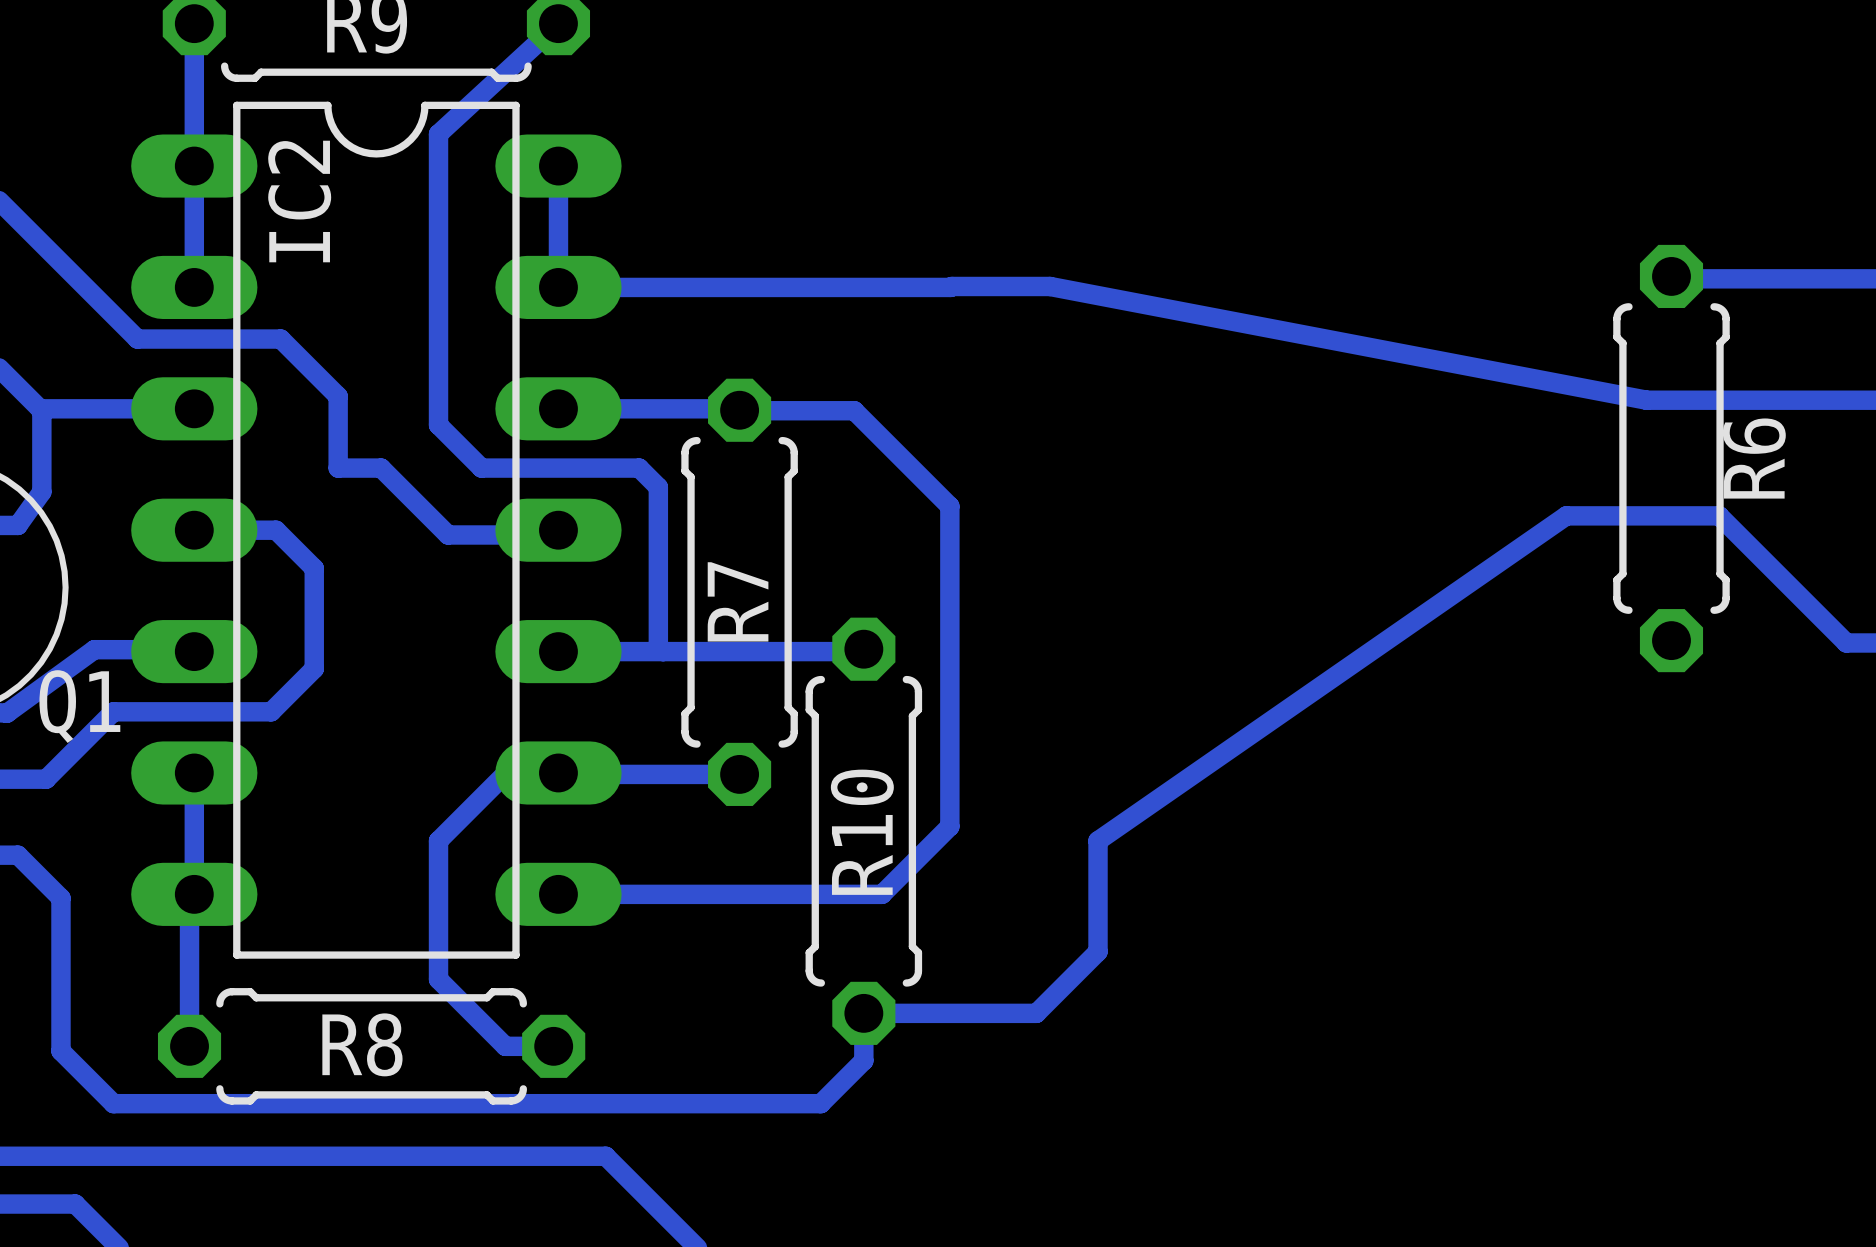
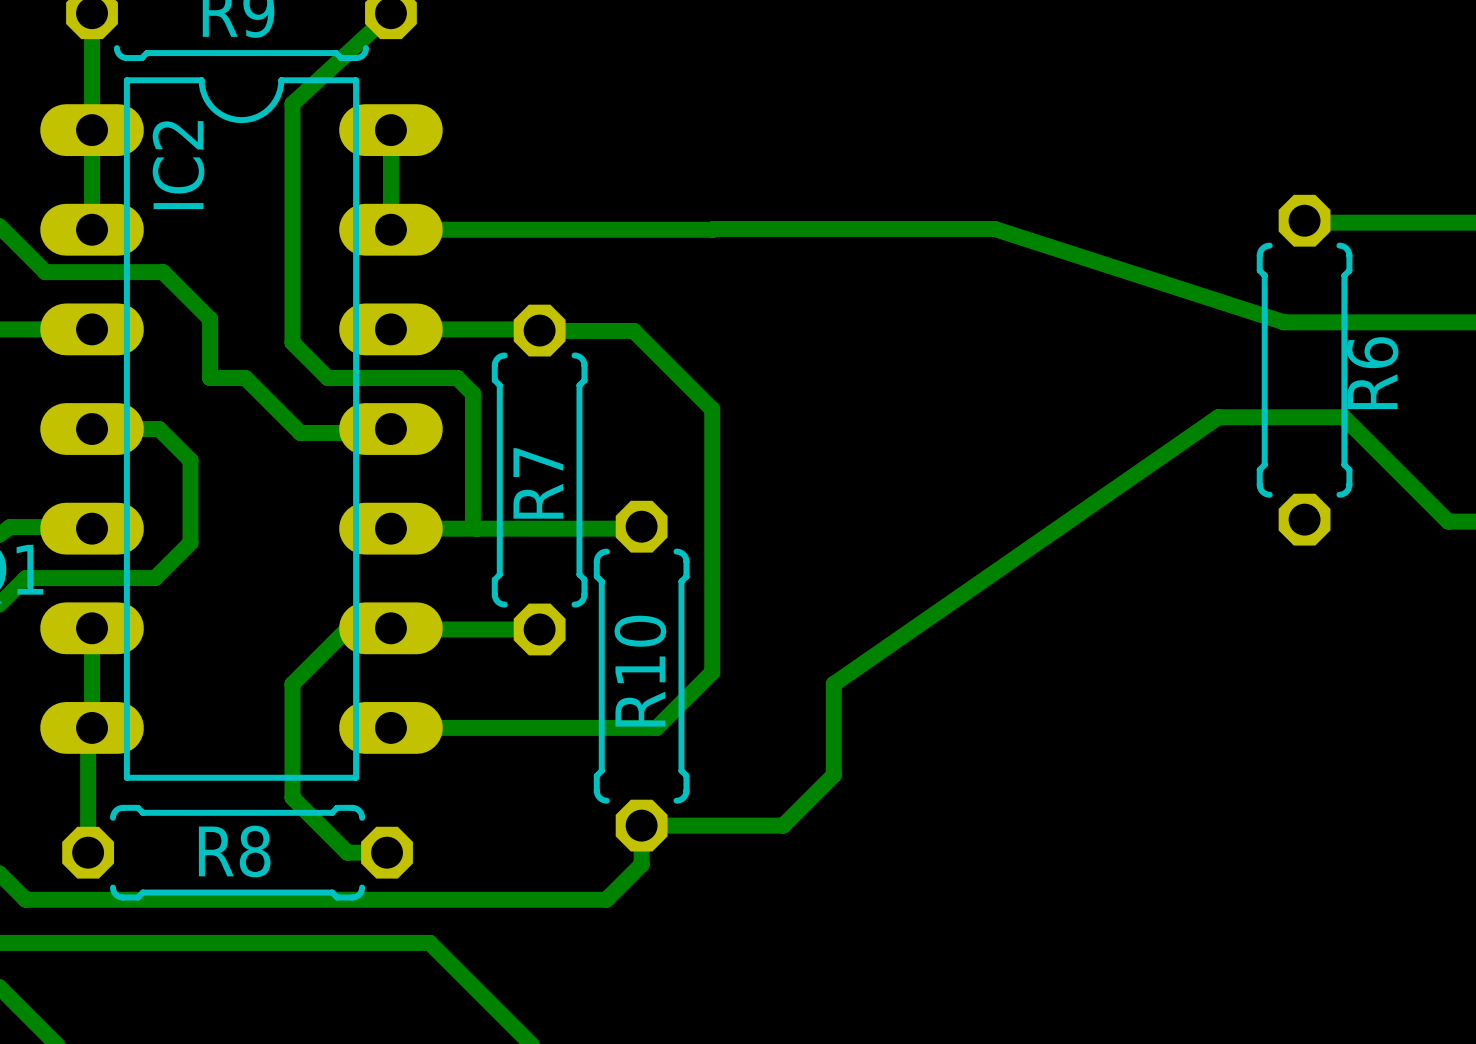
bottom track: (1050, 286) (1646, 400) -> (794, 228) (994, 228) (1284, 322)

